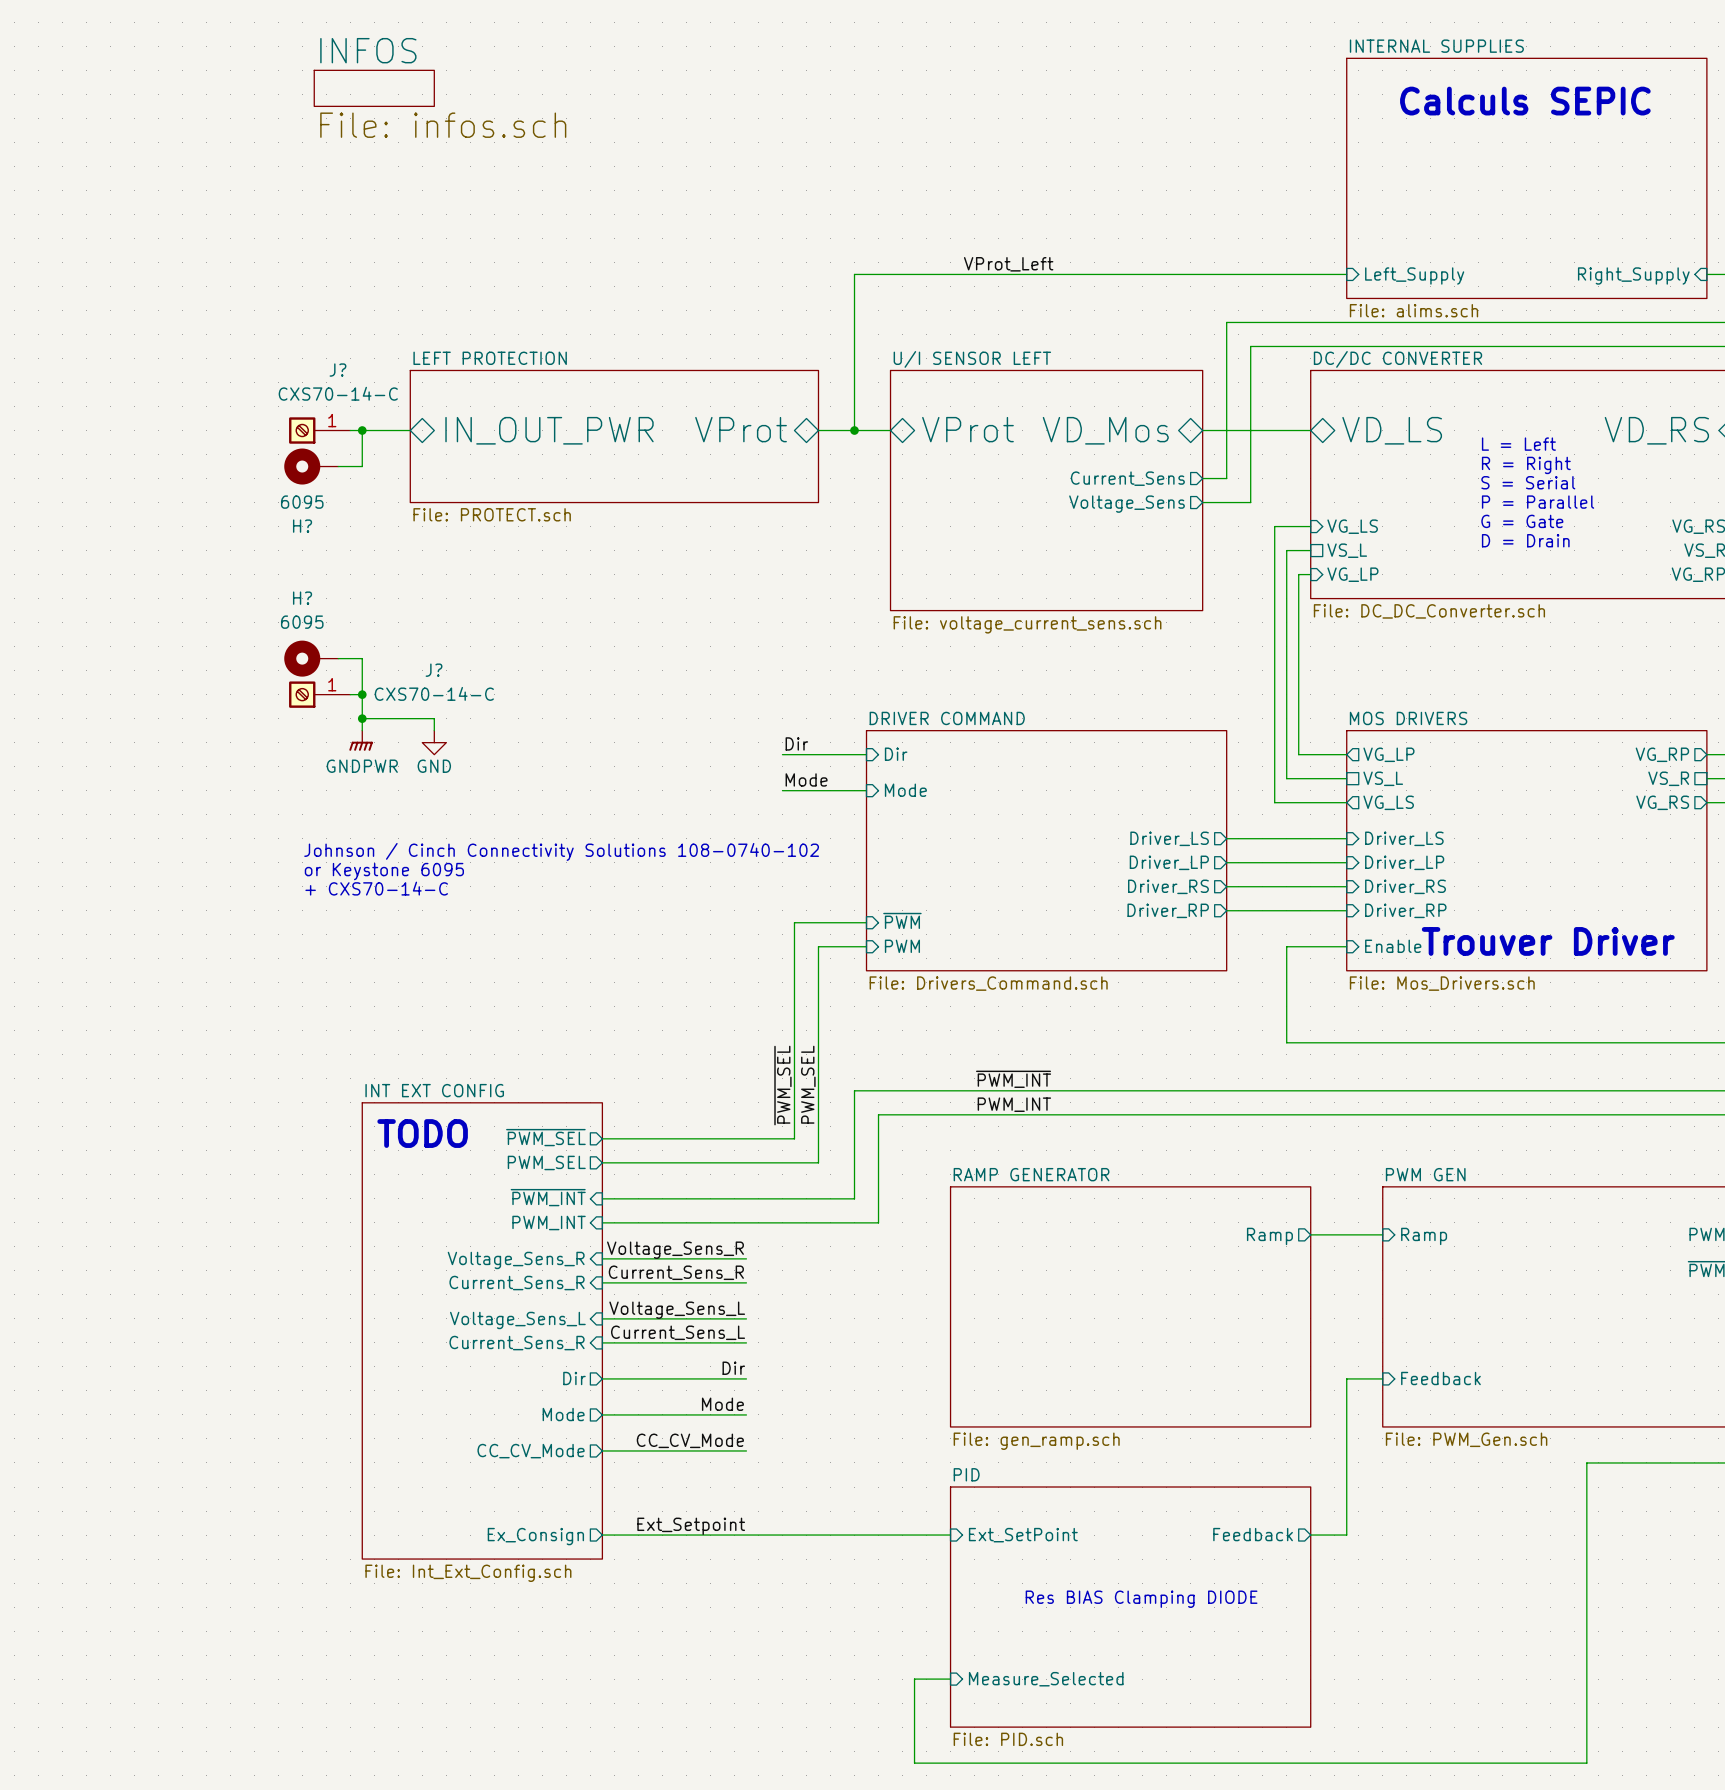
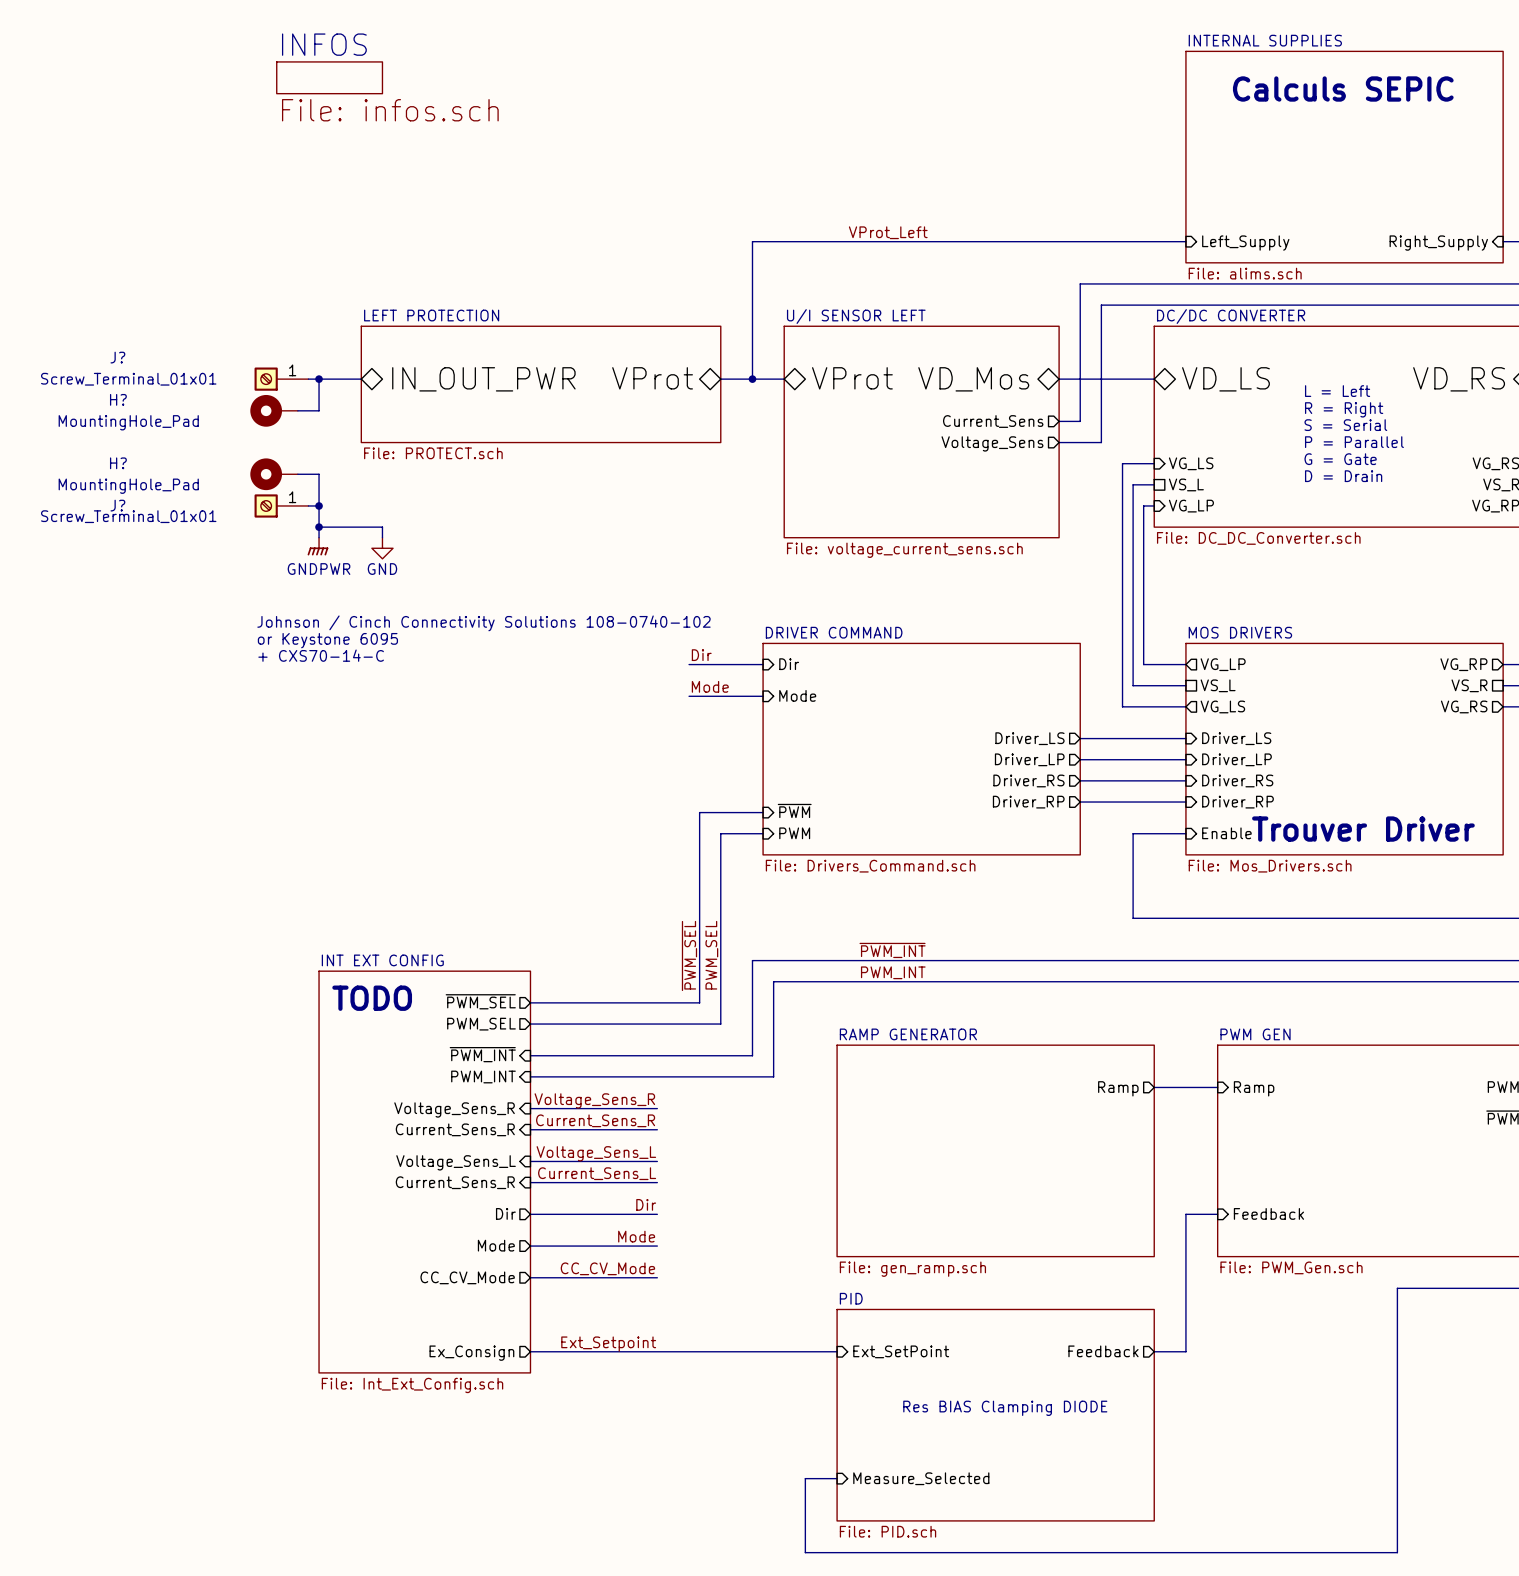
J? name position: J? (337, 370) -> J? (117, 357)
J? value: CXS70-14-C (338, 393) -> Screw_Terminal_01x01 (128, 379)
H? value: 6095 (302, 502) -> MountingHole_Pad (128, 422)
H? name position: H? (302, 526) -> H? (118, 399)
H?: none -> MountingHole_Pad (274, 474)
J?: none -> Screw_Terminal_01x01 (281, 505)
junction: none -> (319, 505)
junction: none -> (319, 527)
H?: 6095 (311, 658) -> none
wire: (338, 658) (362, 658) (362, 730) -> (297, 474) (319, 474) (319, 537)
J?: CXS70-14-C (319, 694) -> none
wire: (350, 694) (362, 694) -> (308, 505) (319, 505)
junction: (362, 694) -> none
wire: (362, 718) (434, 718) (434, 730) -> (319, 527) (382, 527) (382, 537)
junction: (362, 718) -> none
power symbol position: GNDPWR (361, 740) -> GNDPWR (317, 546)
power symbol position: GND (434, 742) -> GND (382, 548)
text position: Johnson / Cinch Connectivity Solutions 108-0740-102 (561, 851) -> Johnson / Cinch Connectivity Solutions 108-0740-102 (483, 623)
text position: or Keystone 6095 (384, 871) -> or Keystone 6095 (327, 640)
text position: + CXS70-14-C (376, 888) -> + CXS70-14-C (321, 655)

